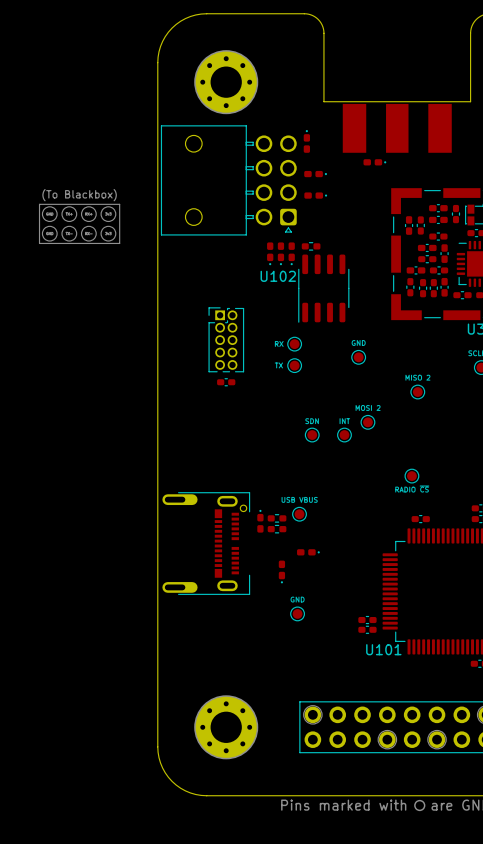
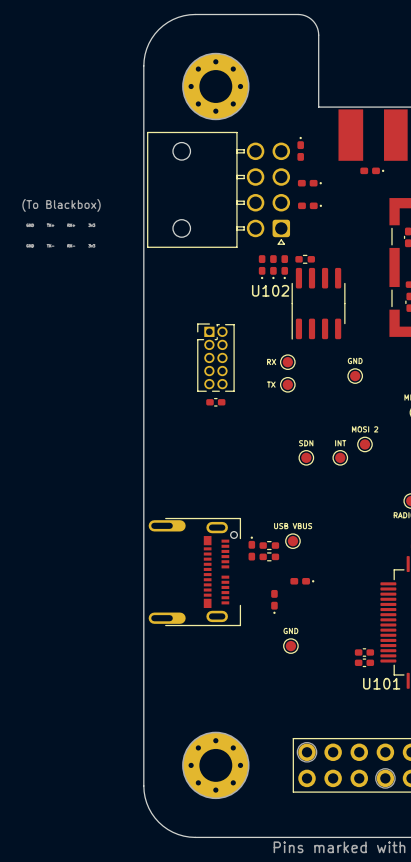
line: (39, 204) (119, 204) (119, 243) (39, 243) (39, 204) -> none
drawing: [41, 206, 117, 242] -> none

